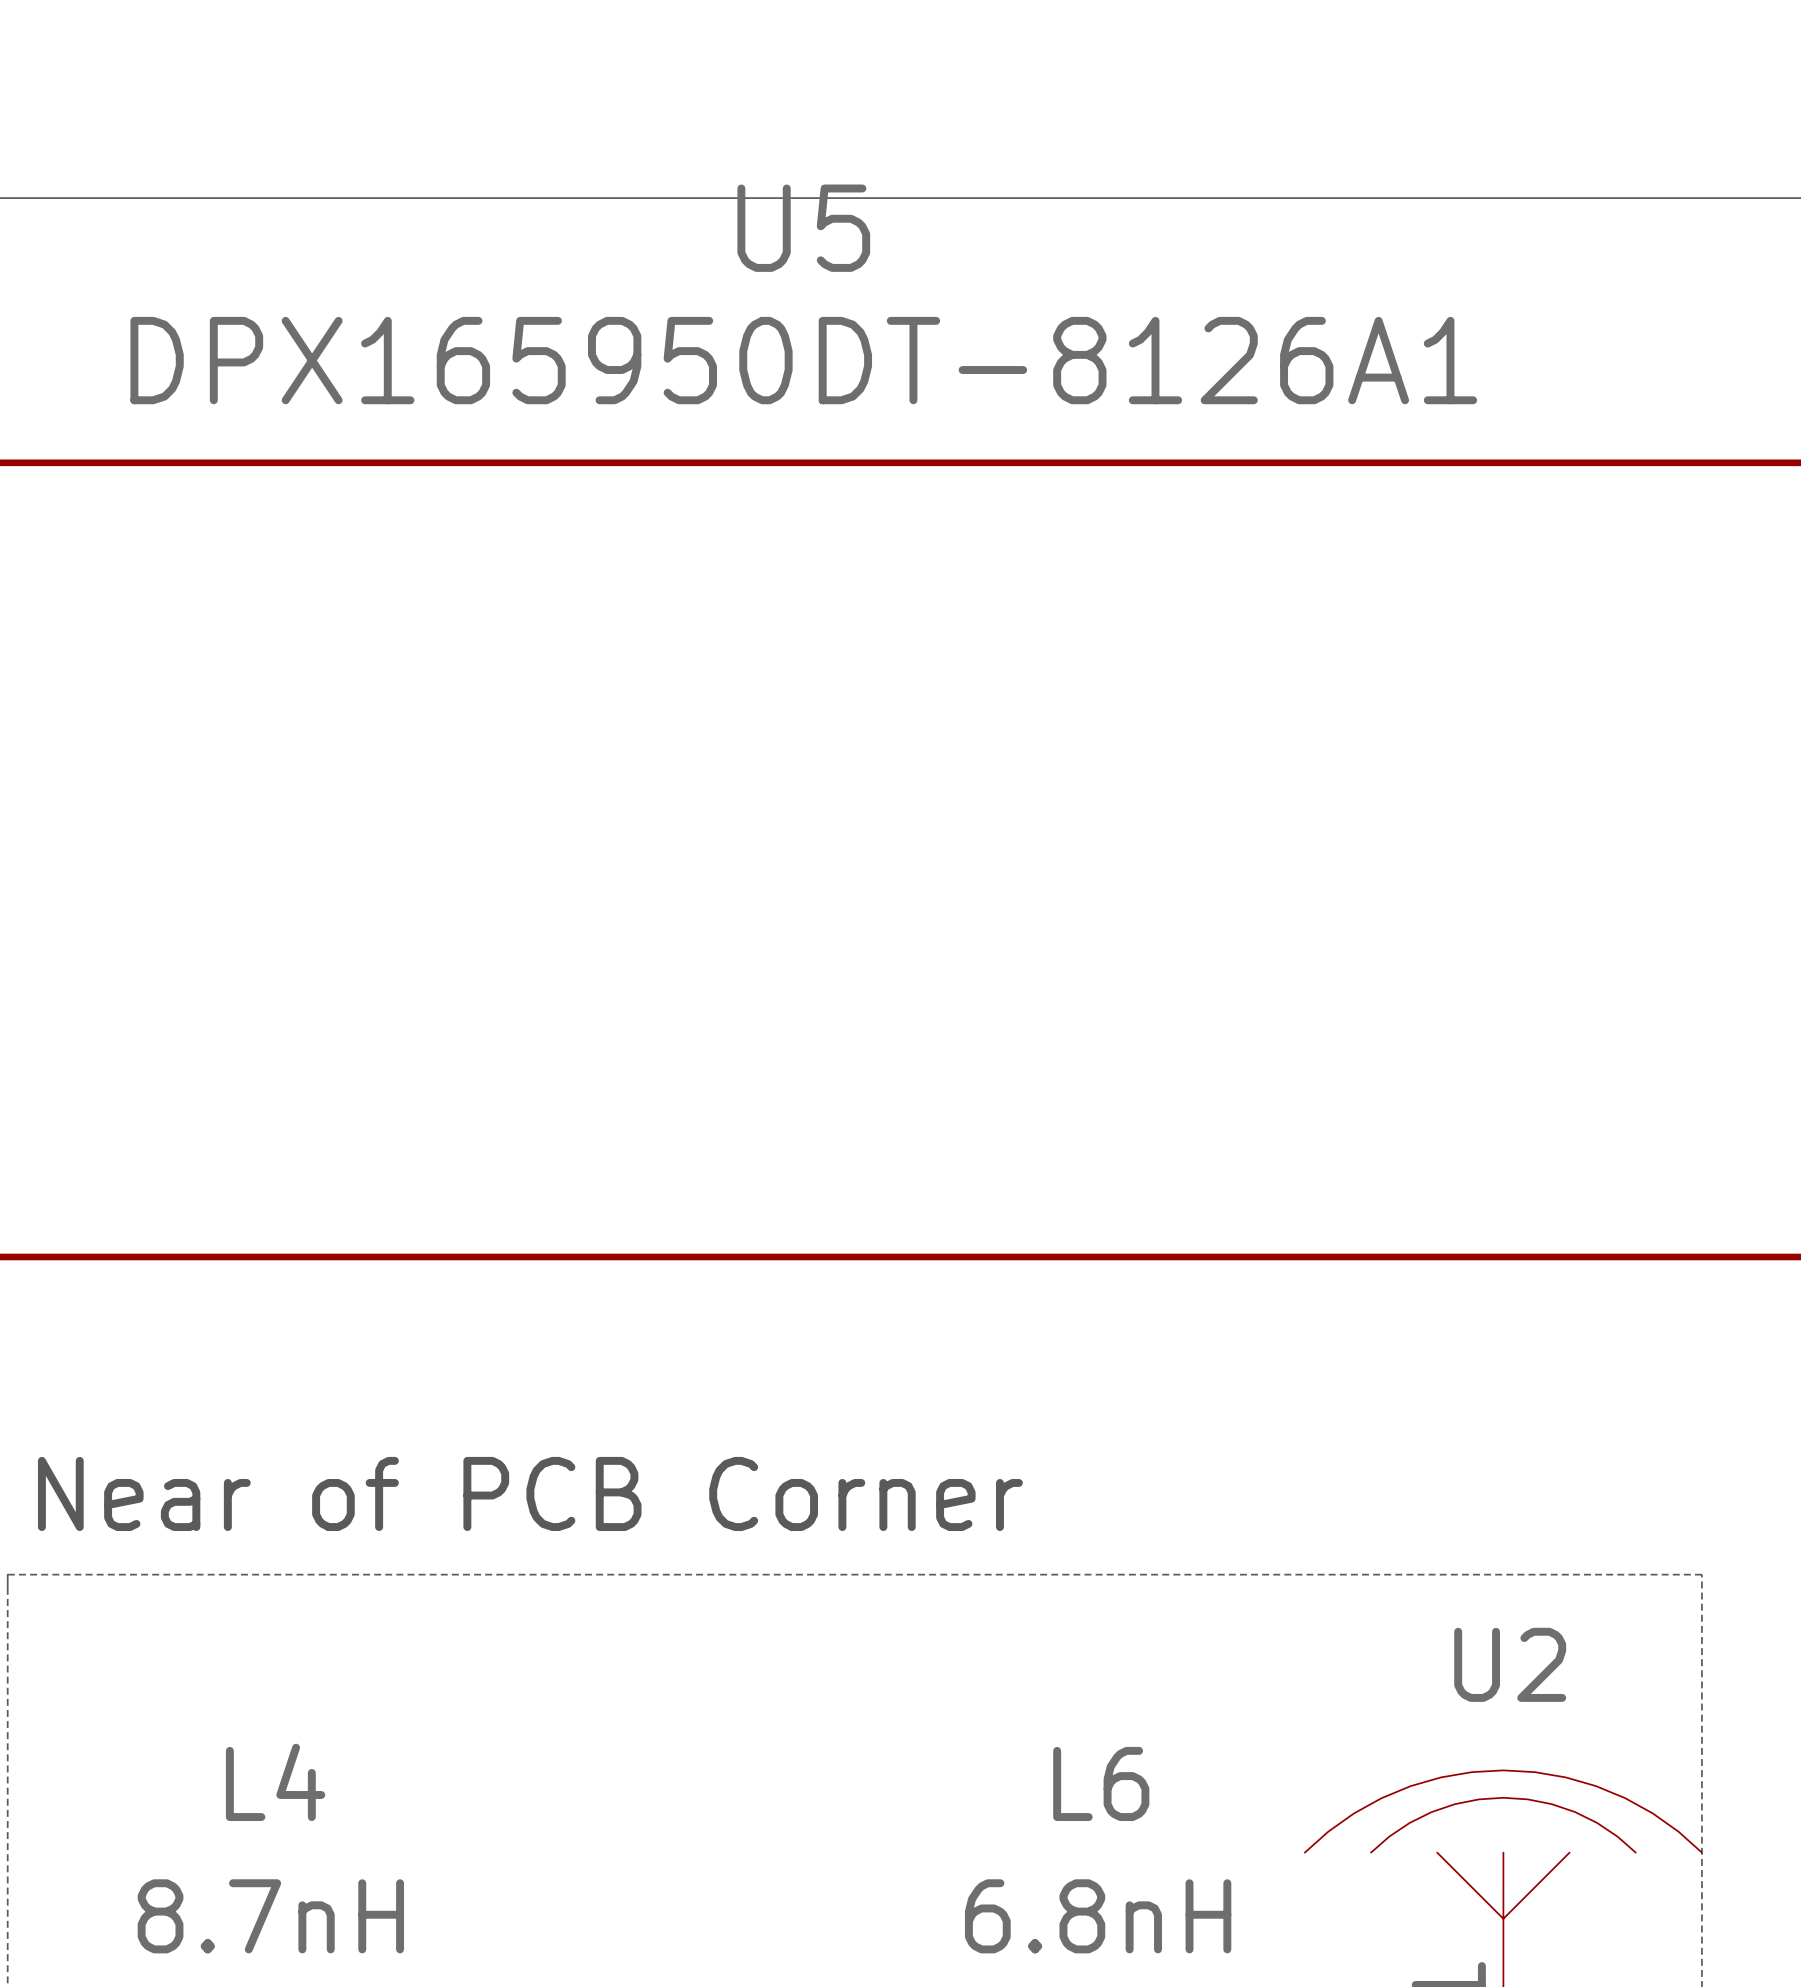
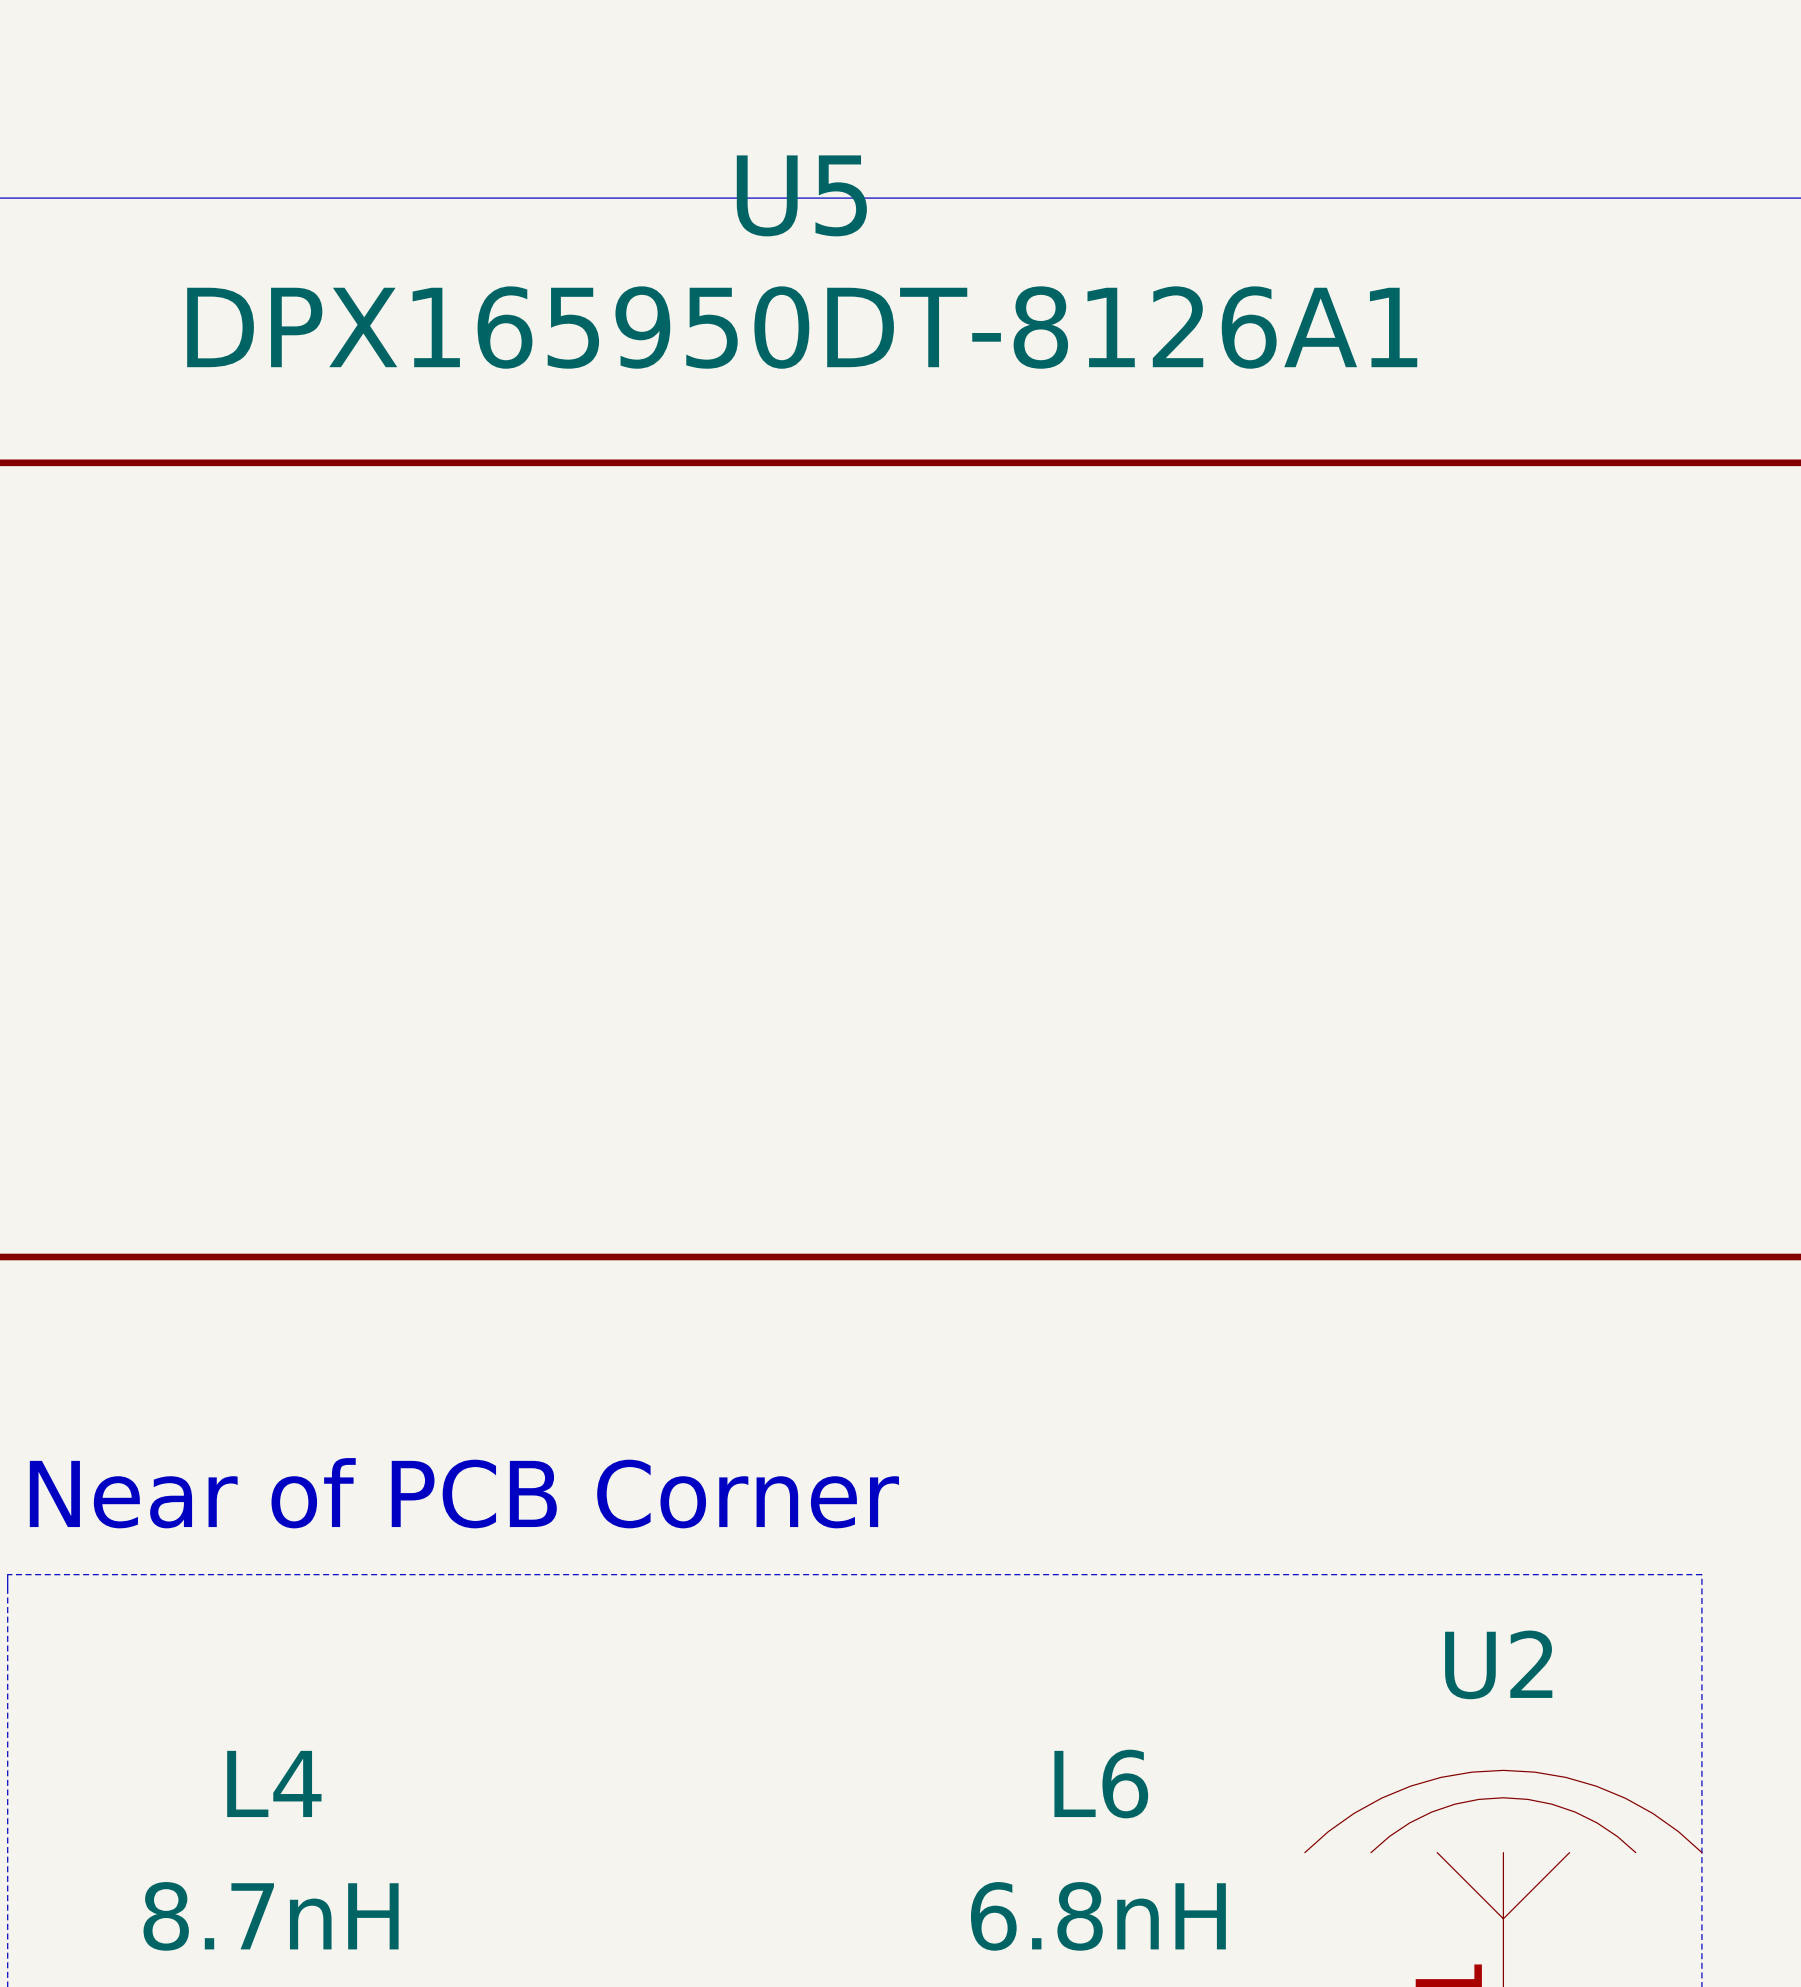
U5 name position: U5 (803, 228) -> U5 (801, 195)
U5 value position: DPX165950DT-8126A1 (803, 360) -> DPX165950DT-8126A1 (802, 327)

